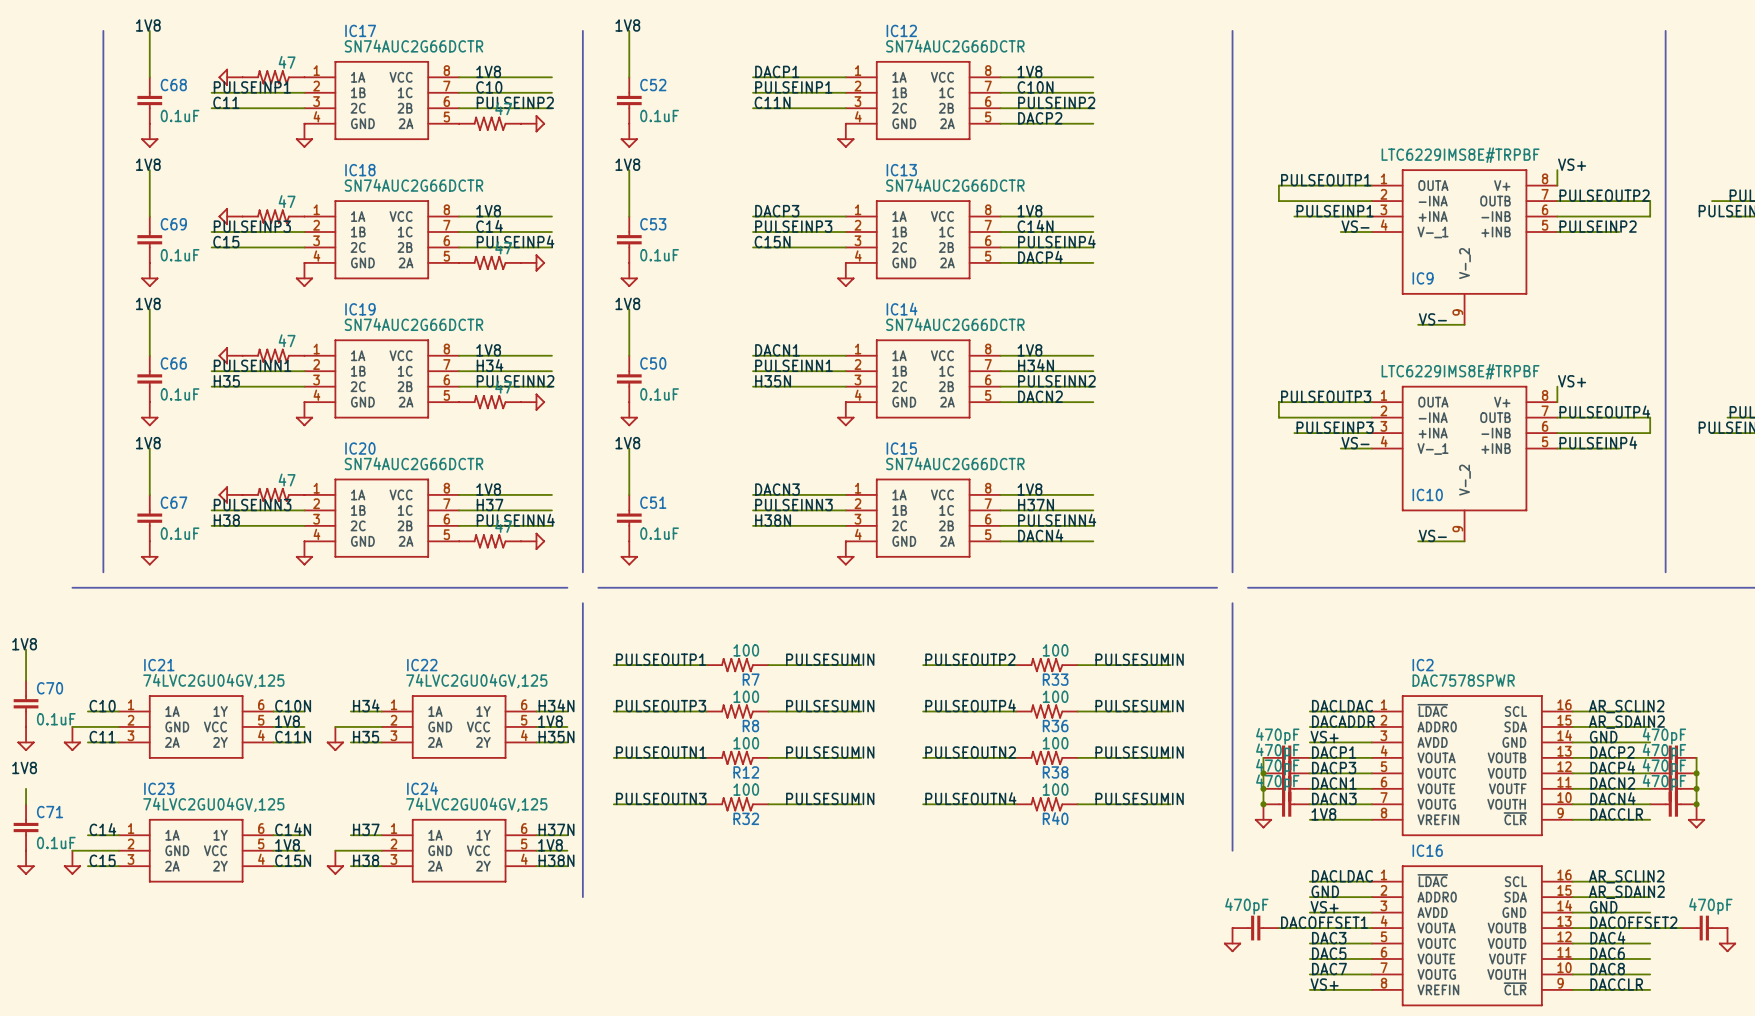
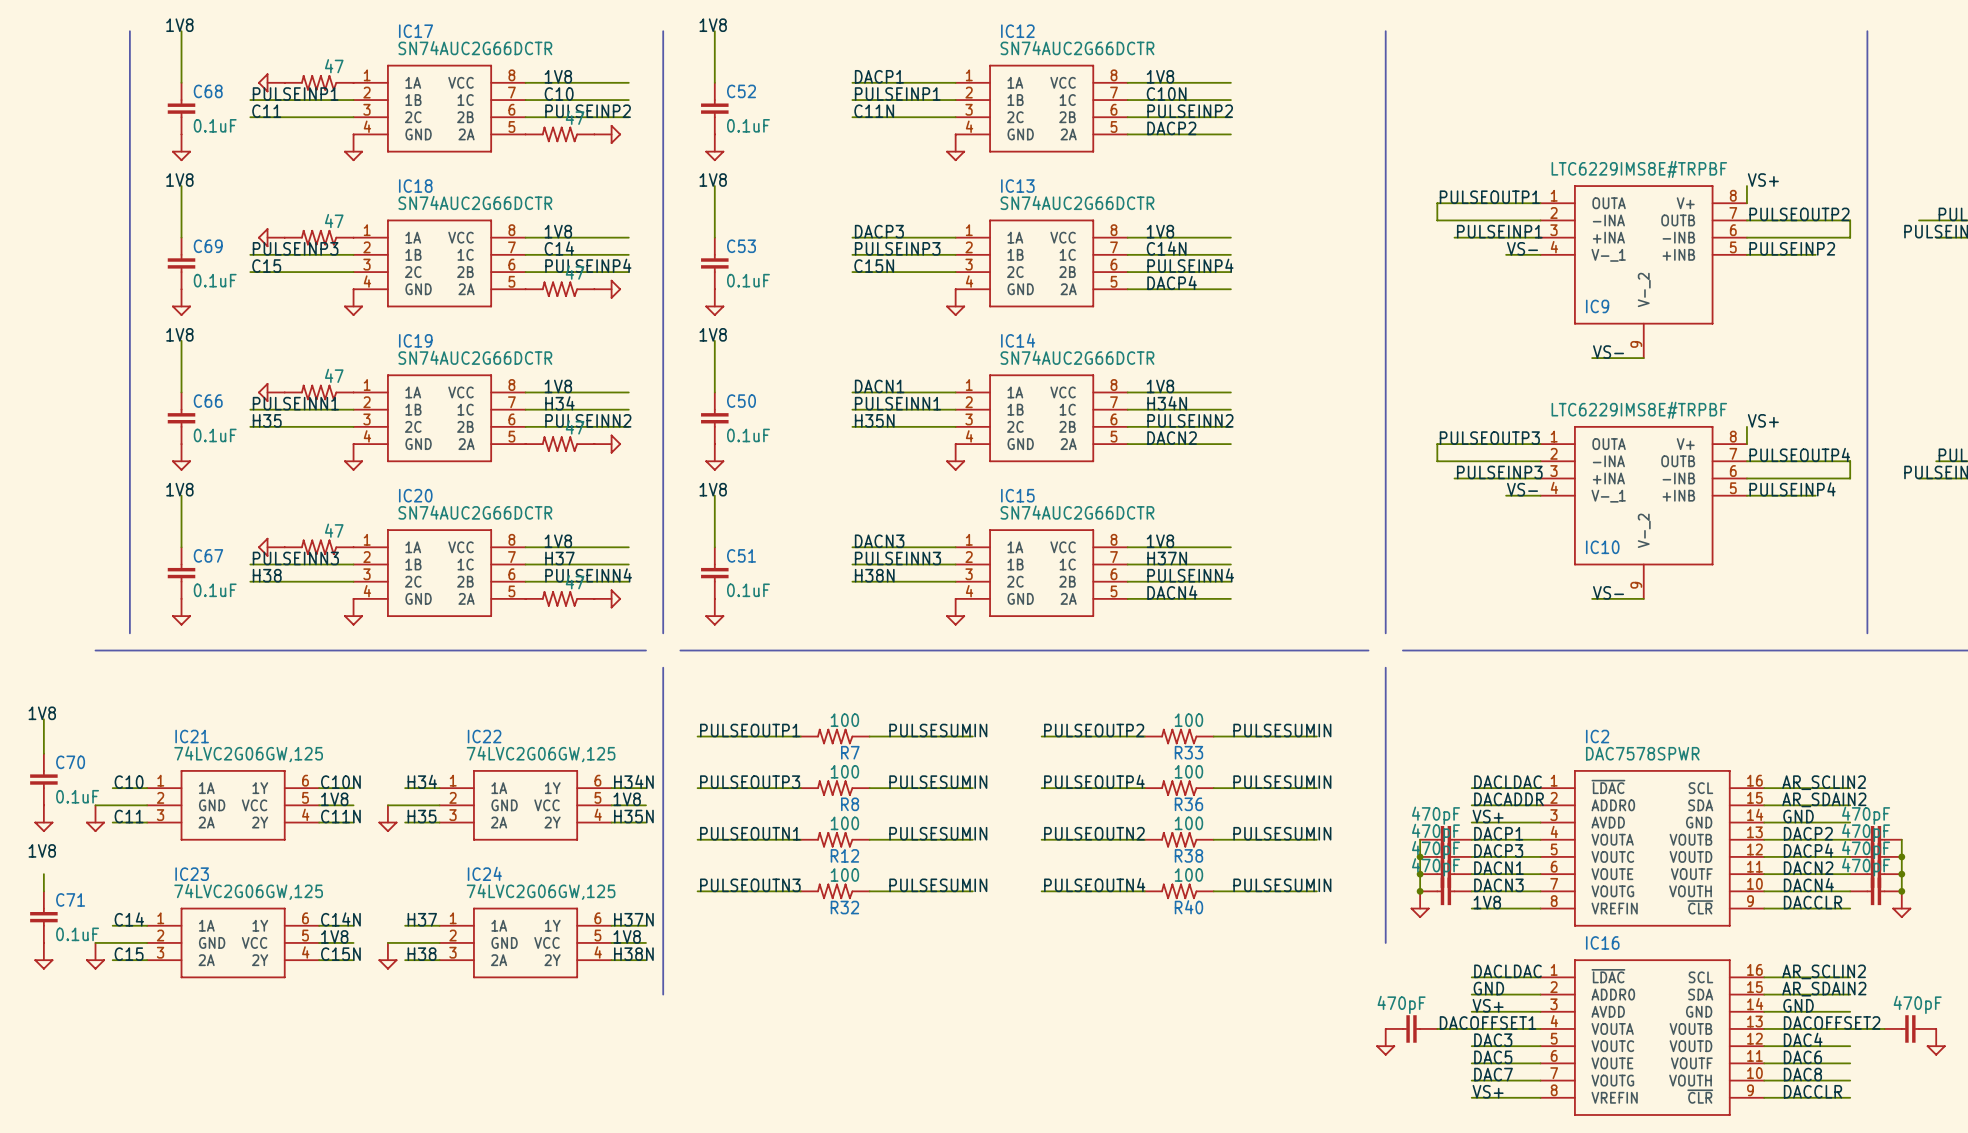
IC21 value: 74LVC2GU04GV,125 (213, 681) -> 74LVC2G06GW,125 (248, 754)
IC22 value: 74LVC2GU04GV,125 (476, 681) -> 74LVC2G06GW,125 (541, 754)
IC23 value: 74LVC2GU04GV,125 (213, 804) -> 74LVC2G06GW,125 (248, 891)
IC24 value: 74LVC2GU04GV,125 (476, 804) -> 74LVC2G06GW,125 (541, 891)

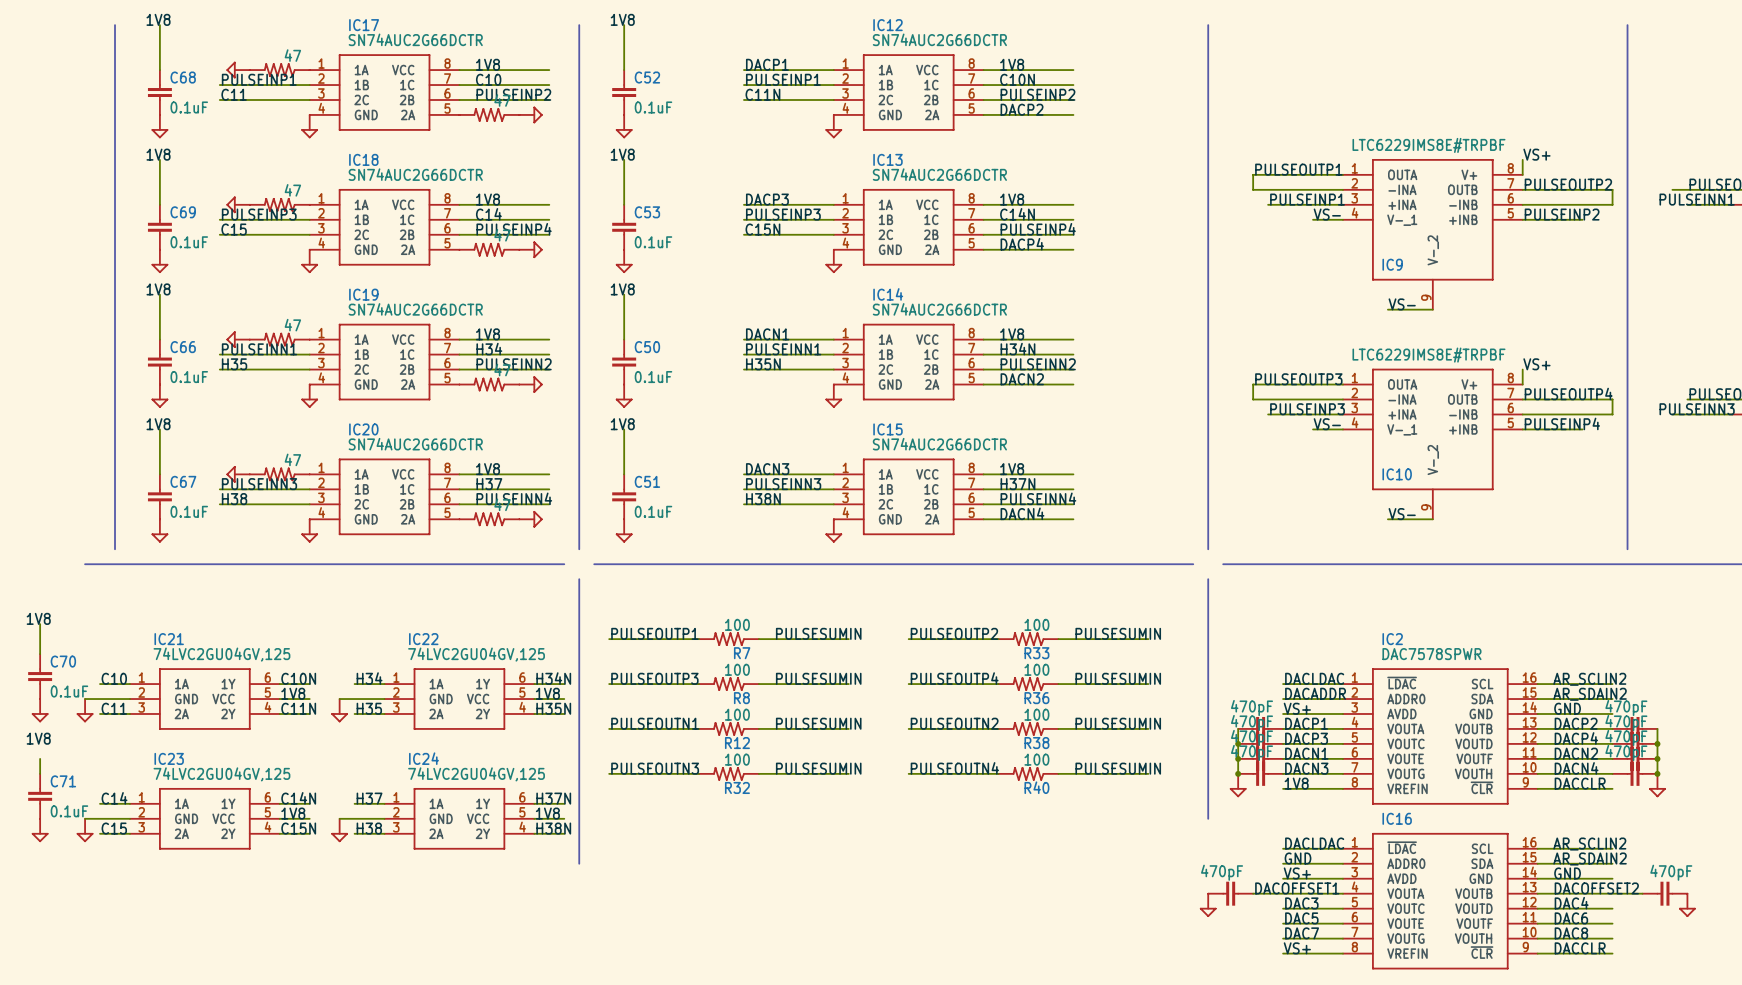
IC21 value: 74LVC2G06GW,125 (248, 754) -> 74LVC2GU04GV,125 (221, 654)
IC22 value: 74LVC2G06GW,125 (541, 754) -> 74LVC2GU04GV,125 (476, 654)
IC23 value: 74LVC2G06GW,125 (248, 891) -> 74LVC2GU04GV,125 (221, 774)
IC24 value: 74LVC2G06GW,125 (541, 891) -> 74LVC2GU04GV,125 (476, 774)

